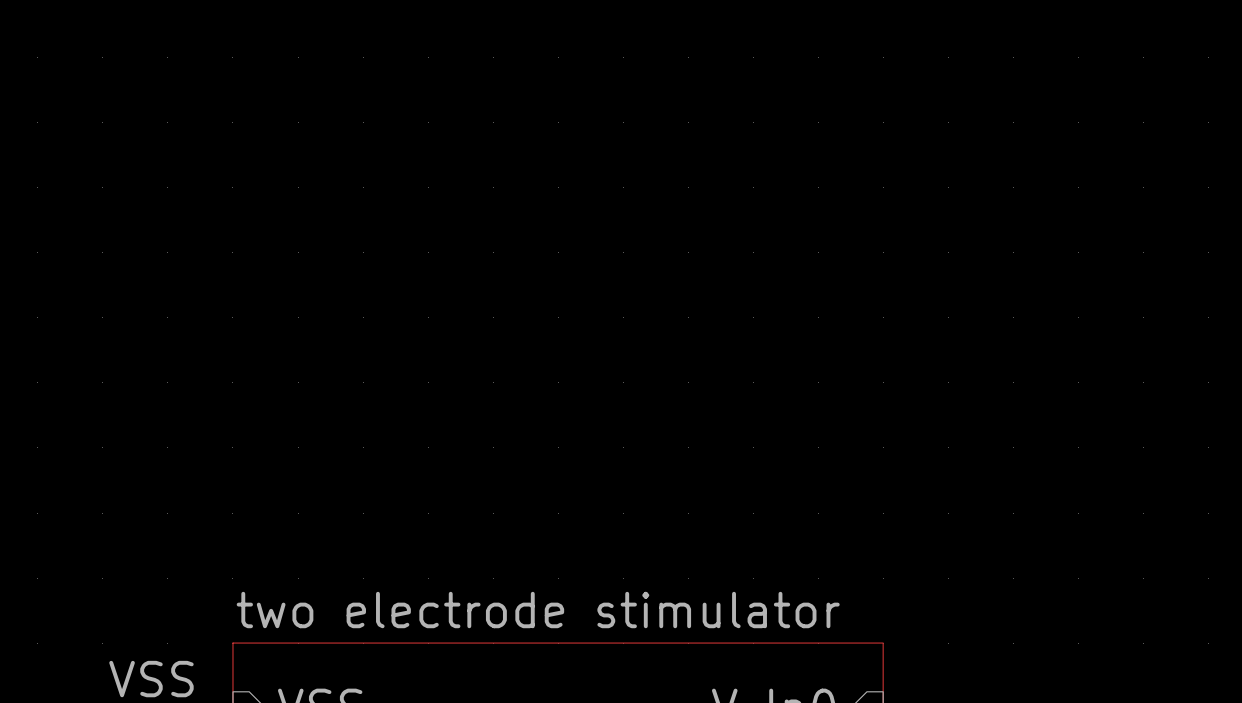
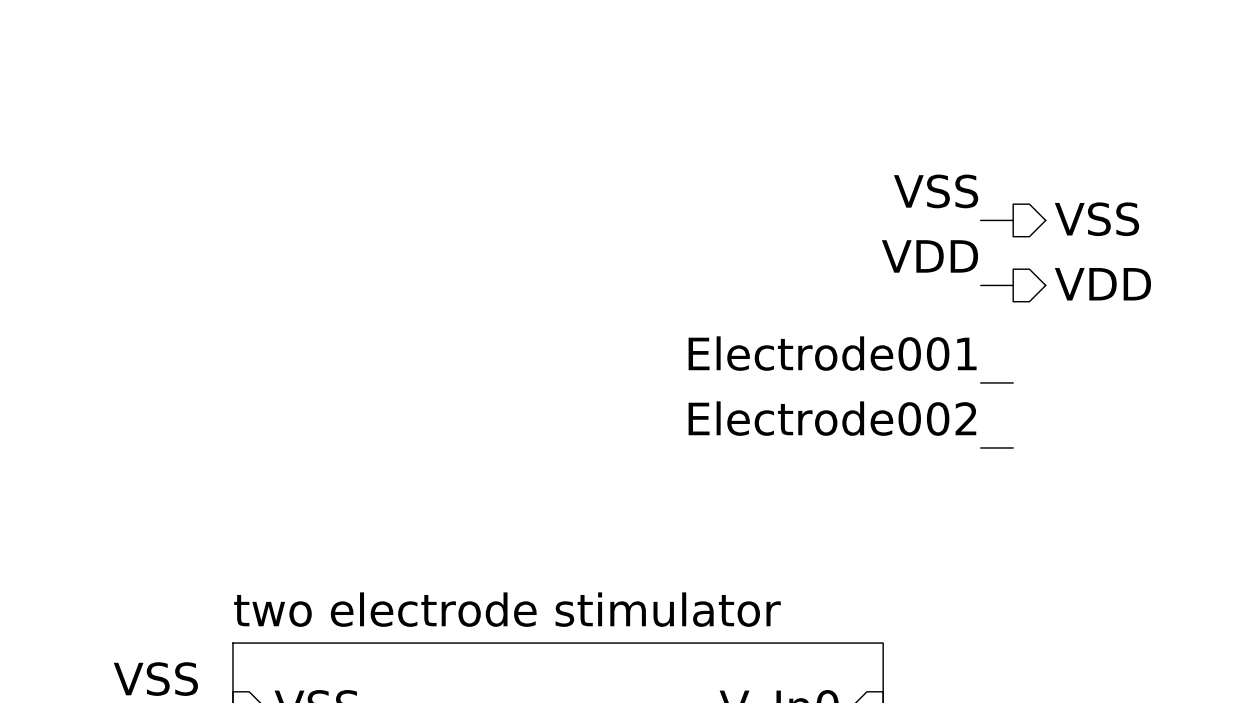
label: none -> VSS (936, 191)
sheet pin: none -> VSS (1096, 219)
wire: none -> (980, 220) (1013, 220)
label: none -> VDD (929, 256)
sheet pin: none -> VDD (1102, 284)
wire: none -> (980, 285) (1013, 285)
label: none -> Electrode001 (832, 353)
wire: none -> (980, 382) (1013, 382)
label: none -> Electrode002 (832, 418)
wire: none -> (980, 447) (1013, 447)

